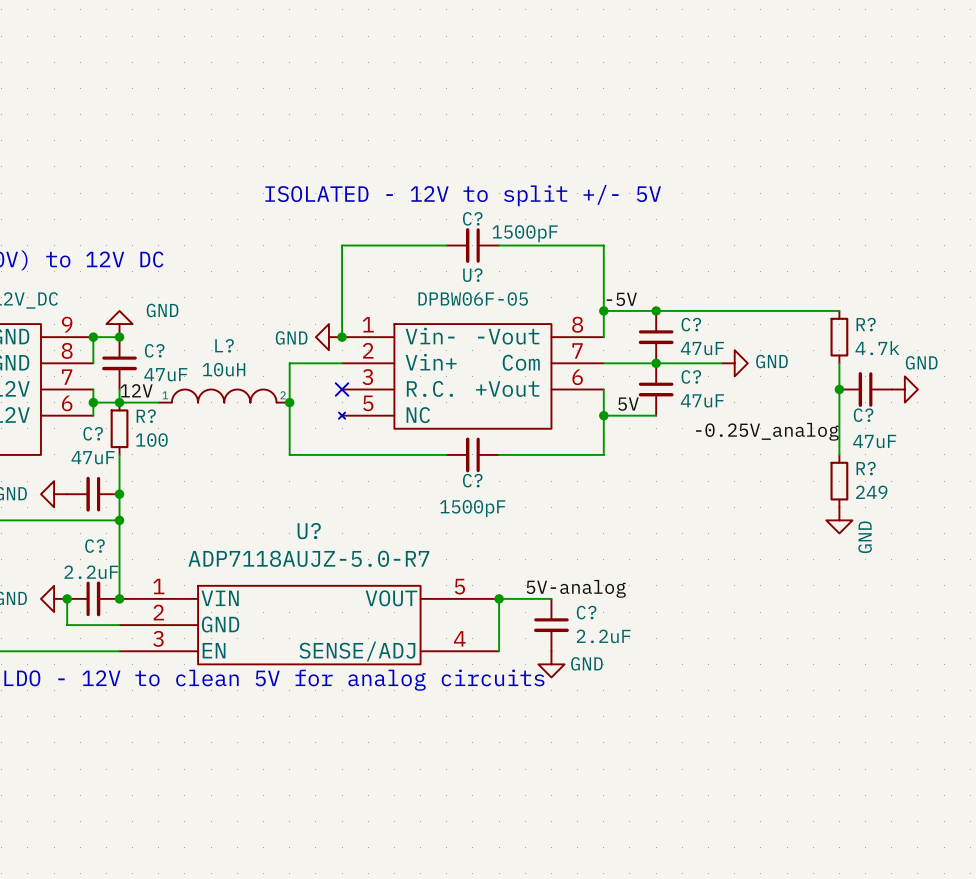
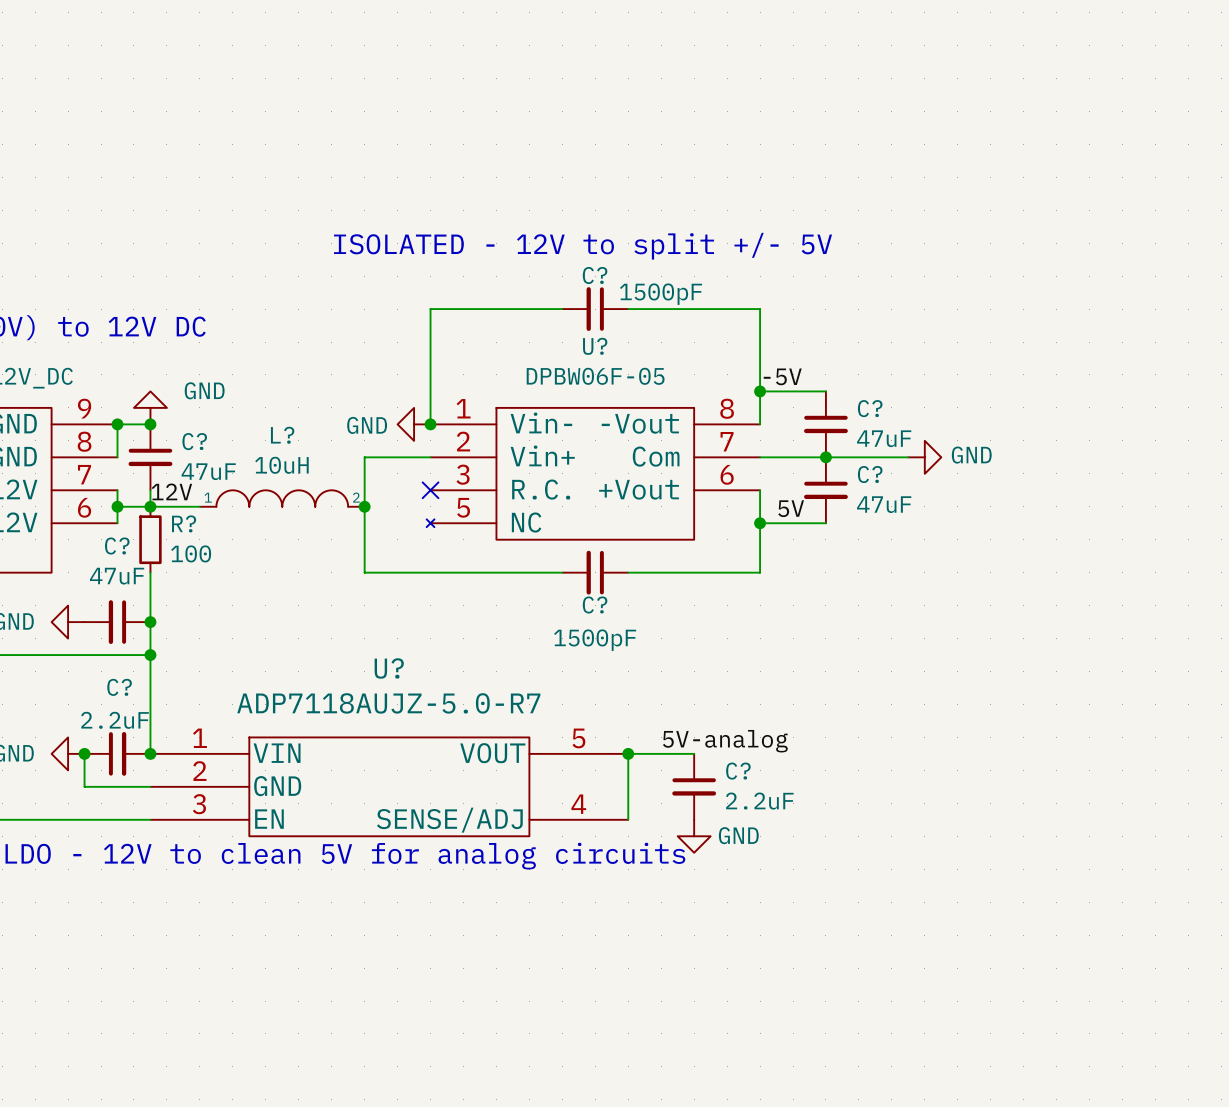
wire: (656, 310) (839, 310) -> none
junction: (656, 310) -> none
R?: 4.7k (839, 337) -> none
wire: (839, 363) (839, 454) -> none
junction: (839, 389) -> none
C?: 47uF (865, 389) -> none
power symbol: GND (904, 389) -> none
label: -0.25V_analog (767, 431) -> none
R?: 249 (839, 481) -> none
power symbol: GND (839, 520) -> none

